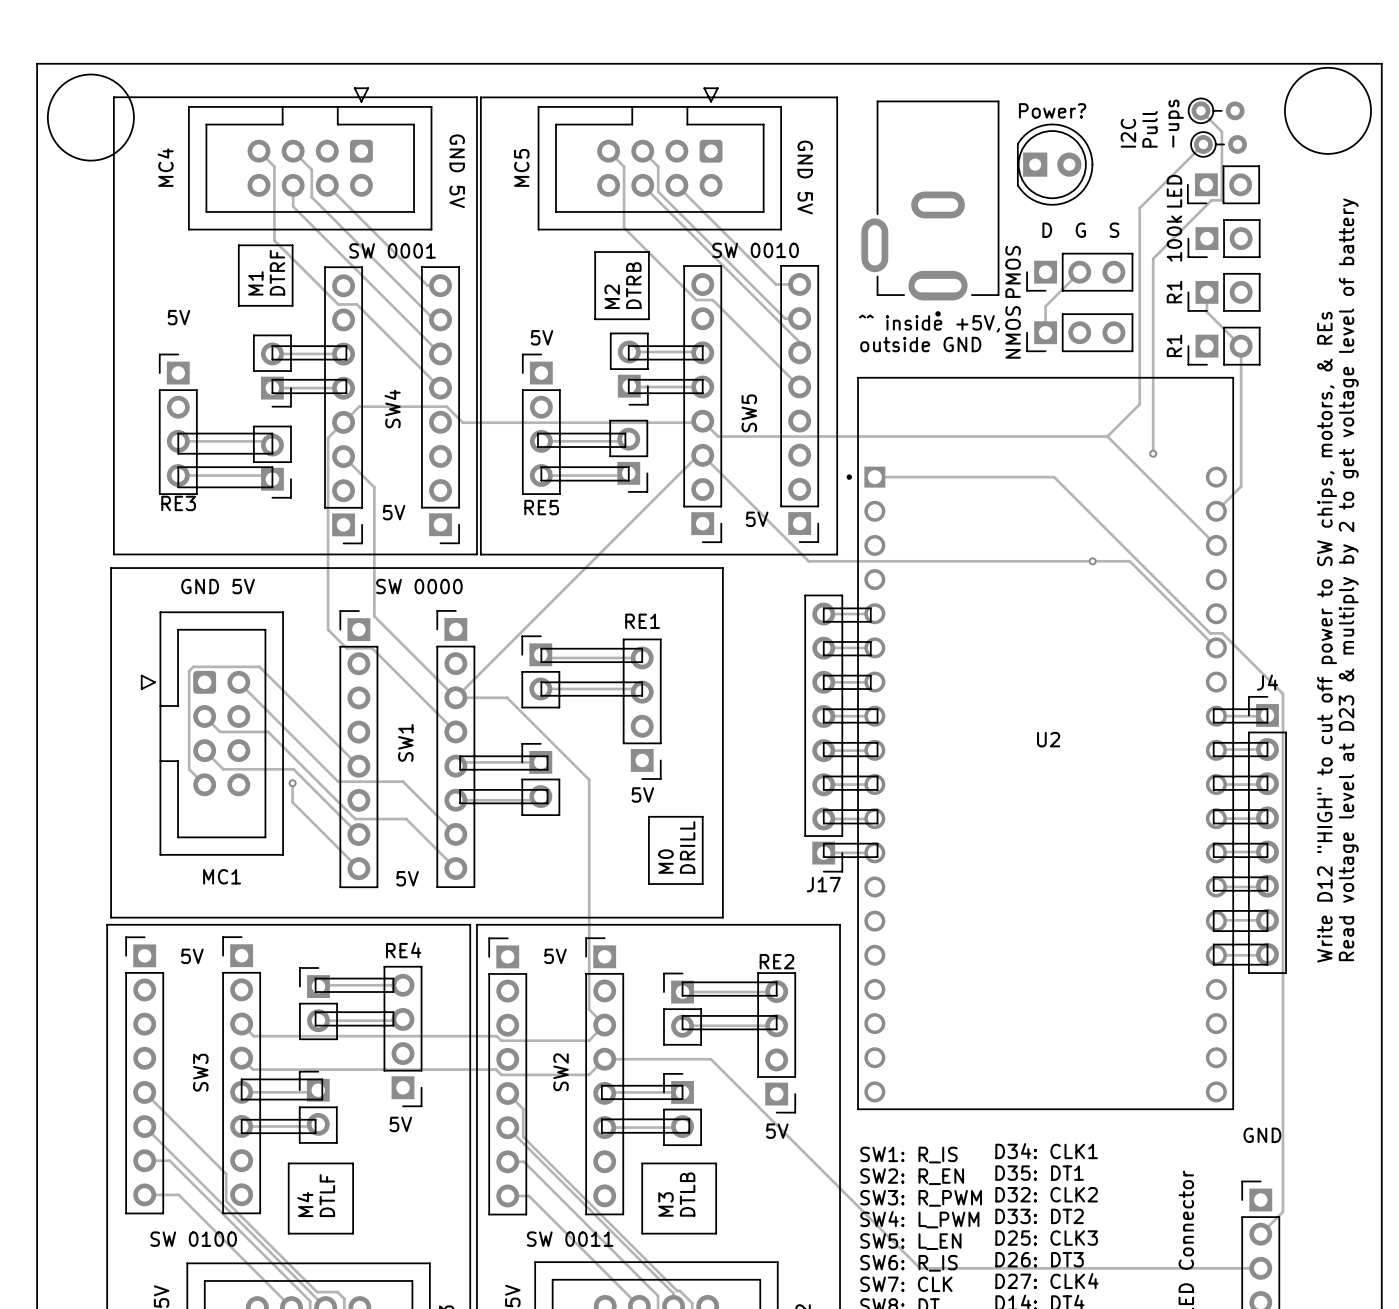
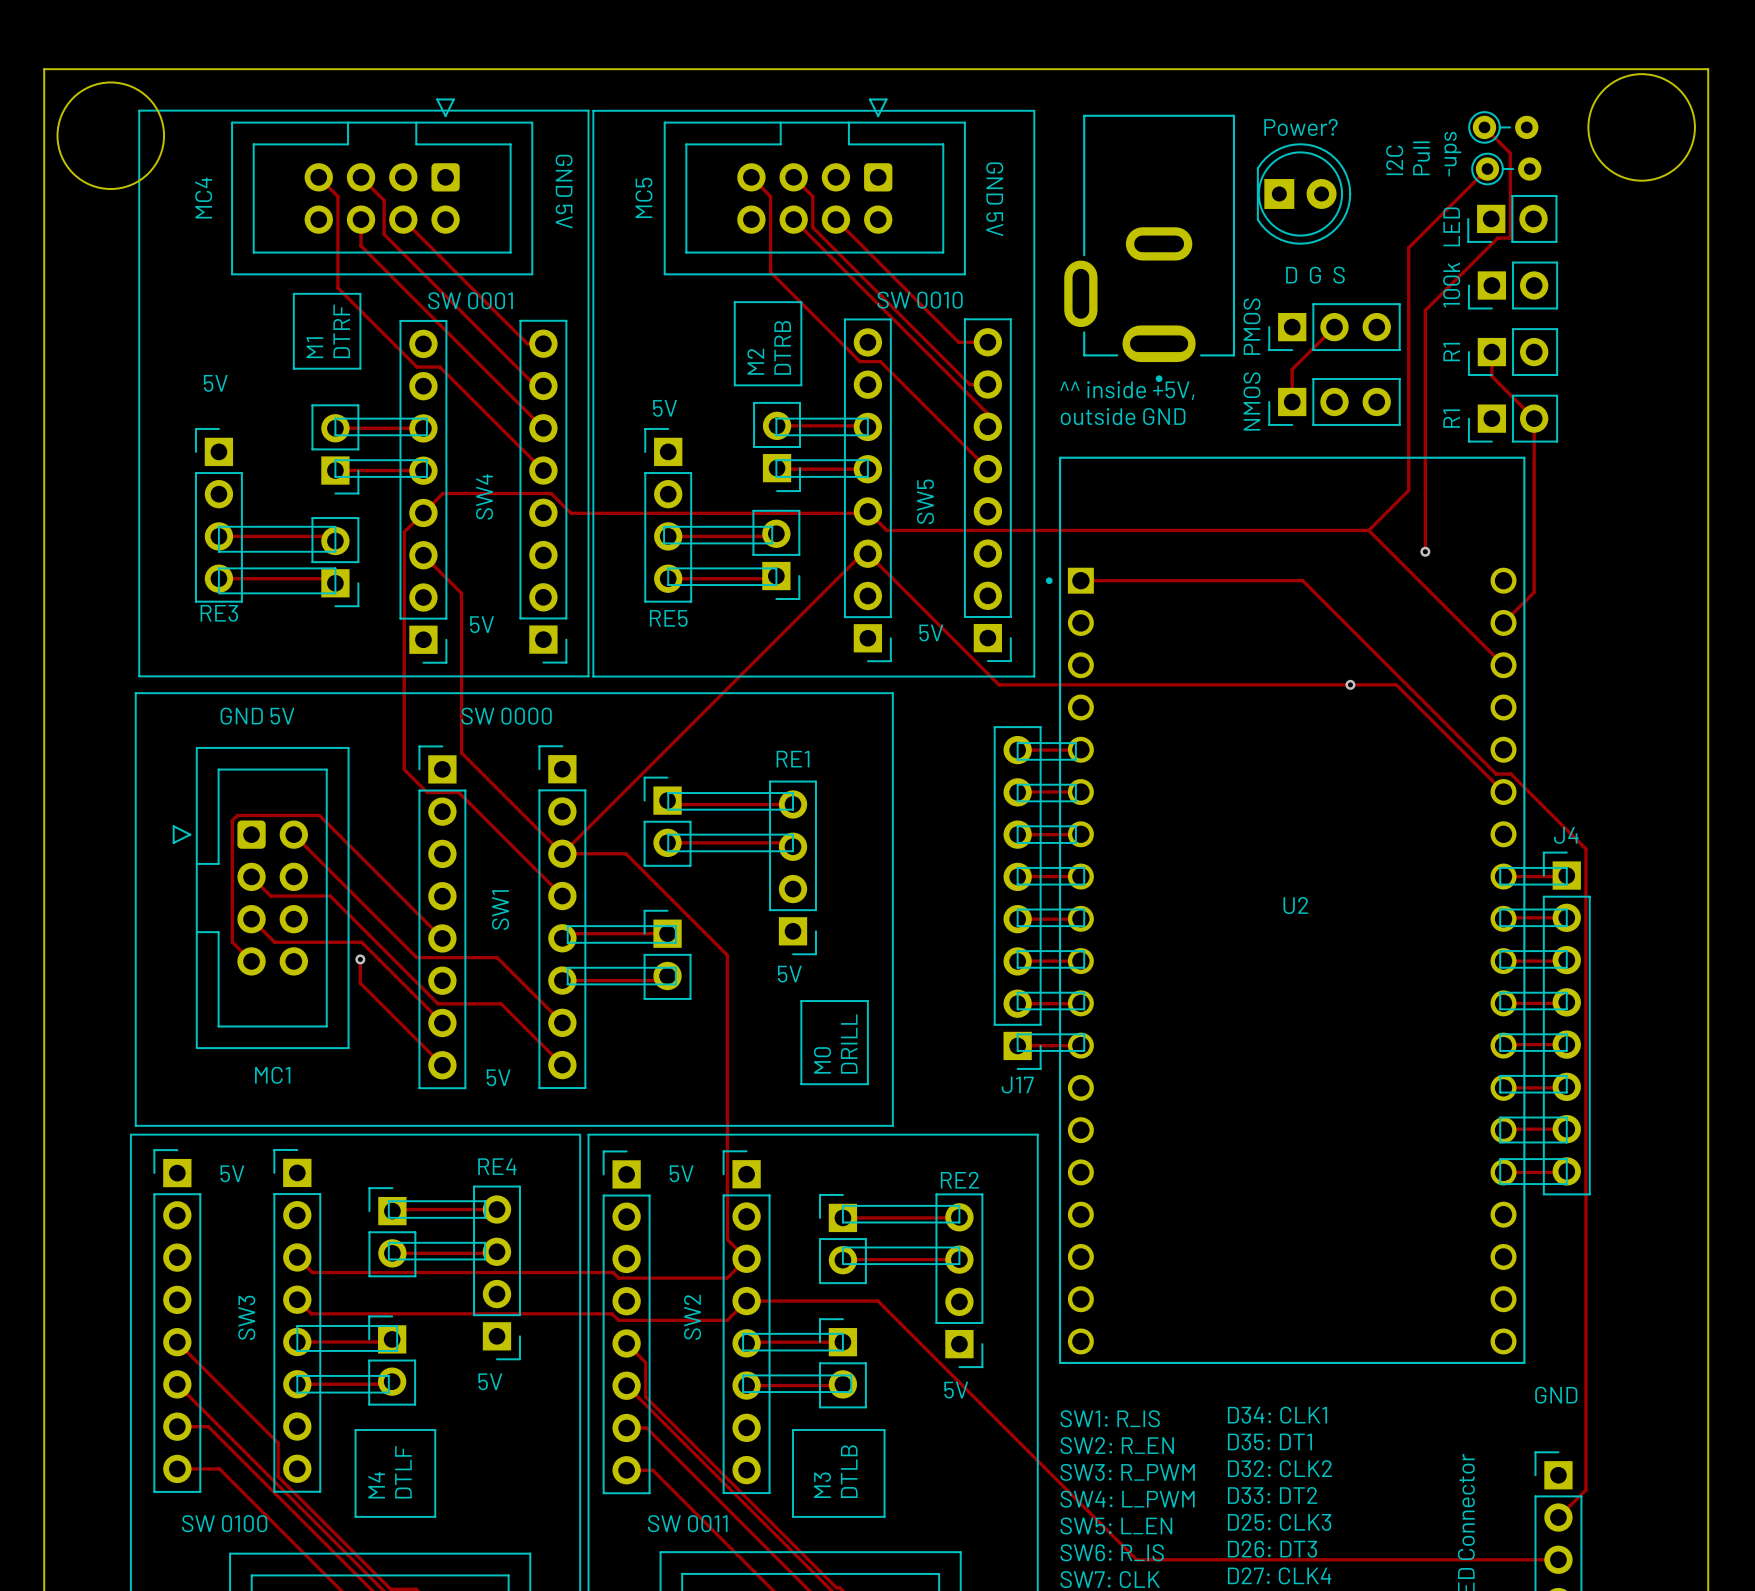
text: Read voltage level at D23 & multiply by 2 to get voltage level of battery (1348, 579) -> none
text: Write D12 "HIGH" to cut off power to SW chips, motors, & REs (1327, 637) -> none

